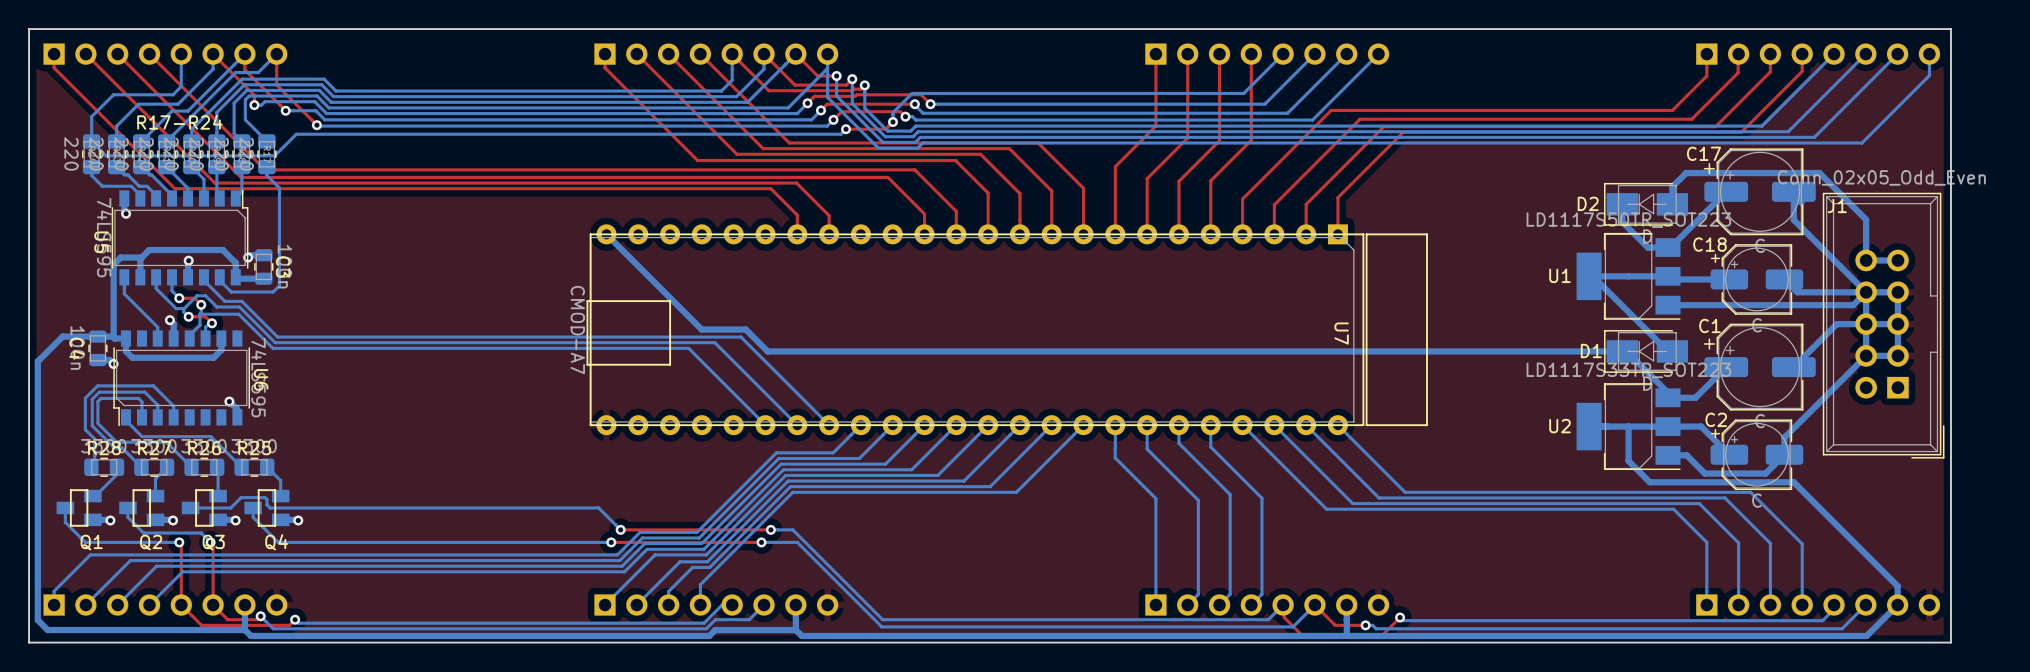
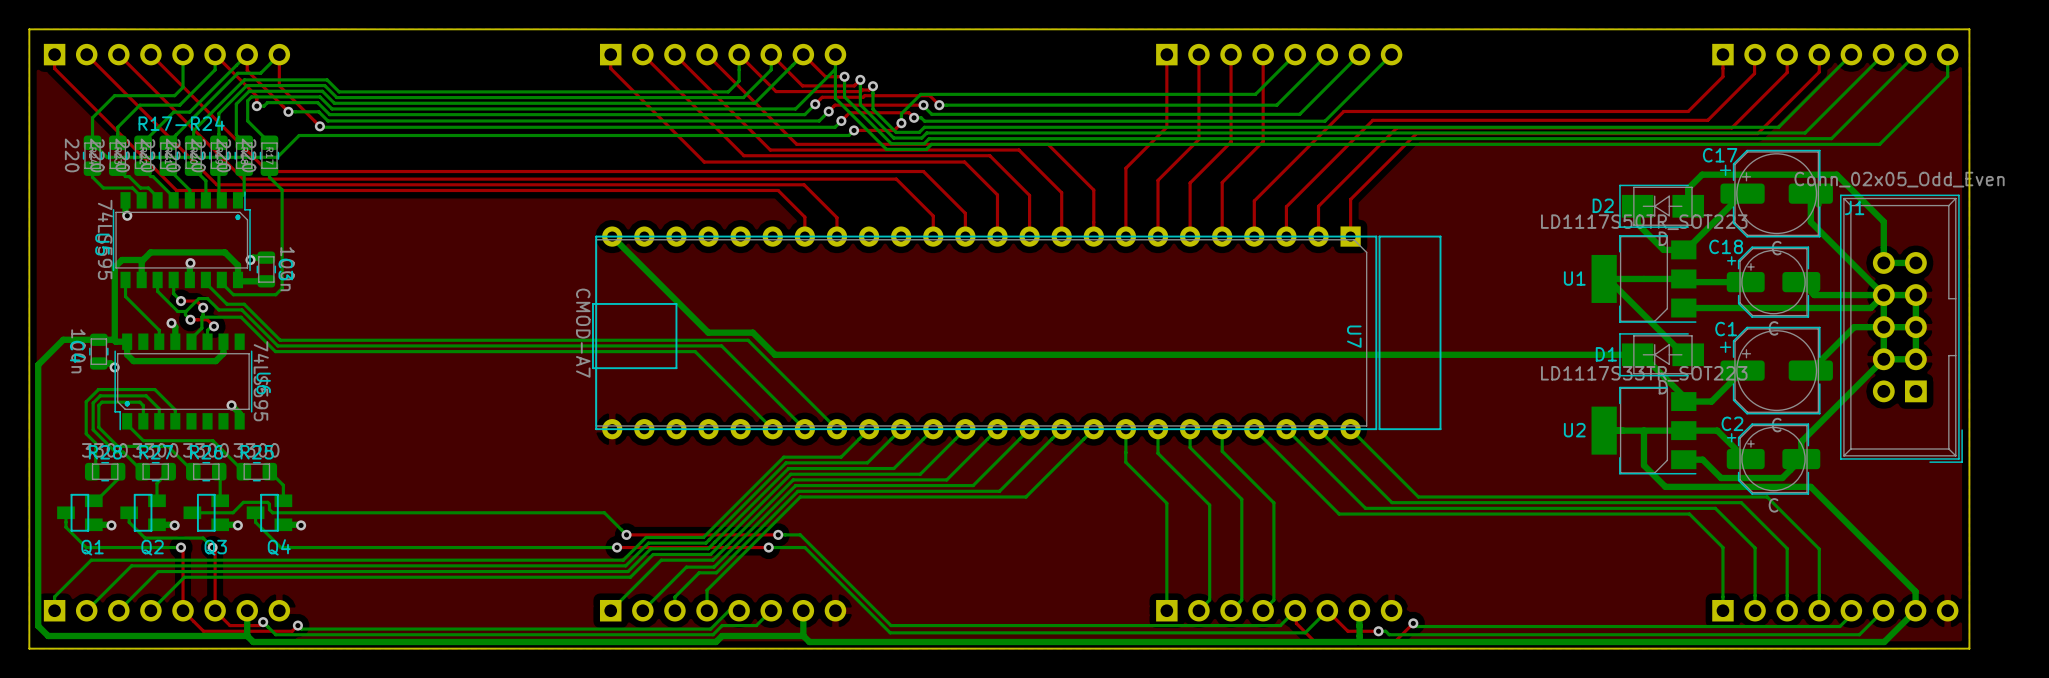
text: none -> . (237, 217)
text: none -> . (127, 403)

